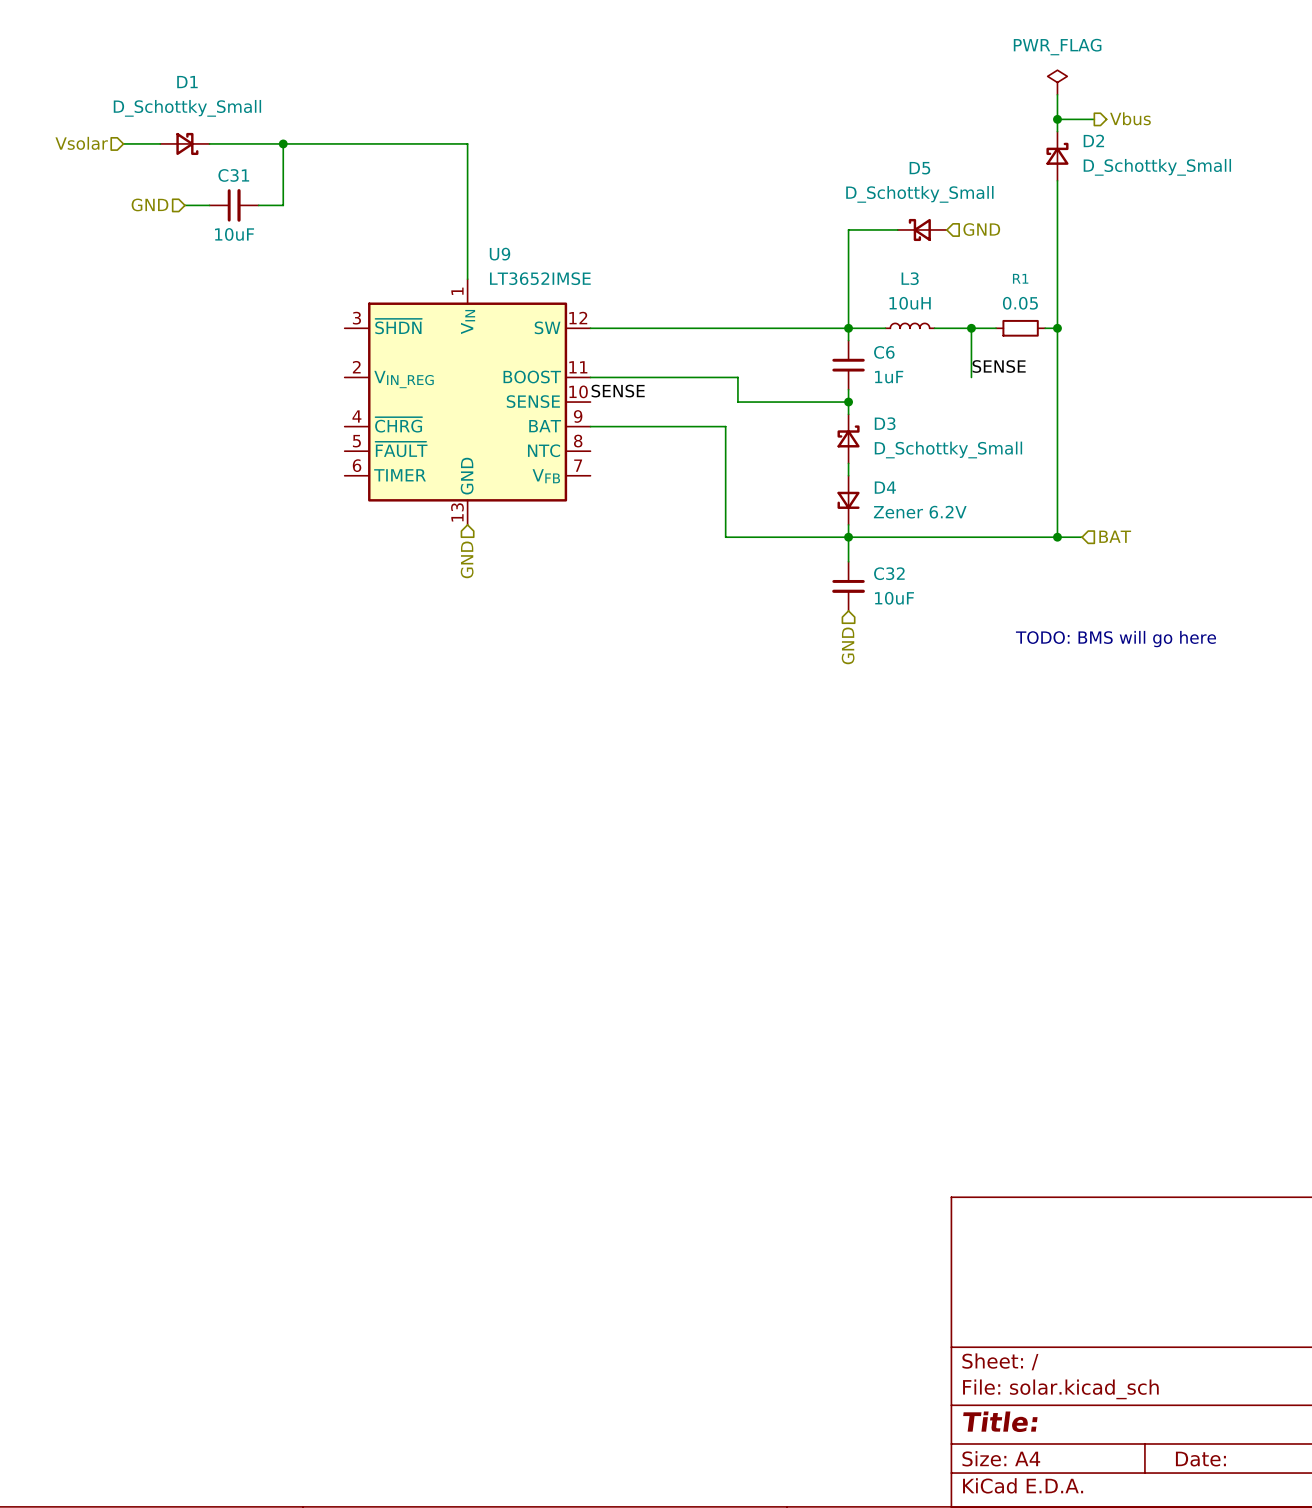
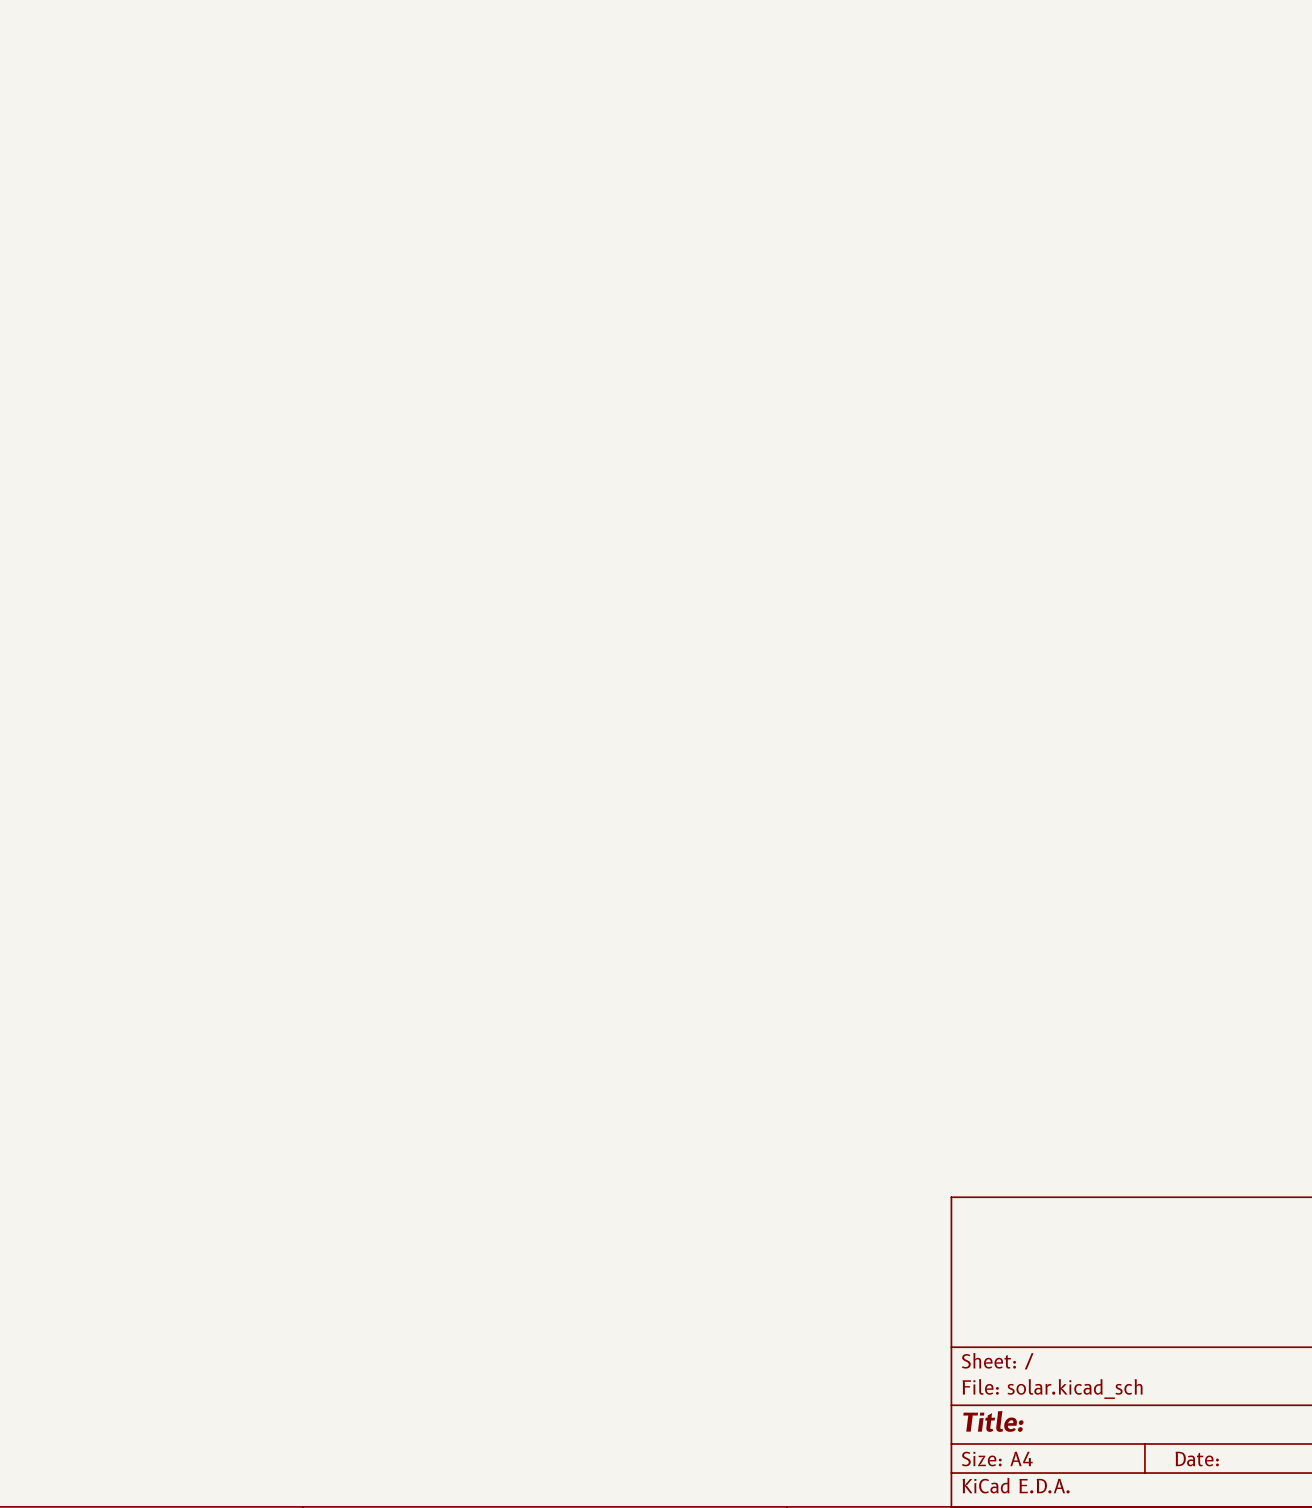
power symbol: PWR_FLAG (1057, 82) -> none
wire: (1057, 94) (1057, 131) -> none
hierarchical label: Vbus (1130, 118) -> none
wire: (1057, 119) (1094, 119) -> none
junction: (1057, 119) -> none
hierarchical label: Vsolar (81, 143) -> none
wire: (123, 143) (160, 143) -> none
D1: D_Schottky_Small (184, 143) -> none
wire: (209, 143) (467, 143) (467, 279) -> none
wire: (283, 143) (283, 205) (258, 205) -> none
junction: (283, 143) -> none
D2: D_Schottky_Small (1057, 156) -> none
wire: (1057, 180) (1057, 537) -> none
hierarchical label: GND (149, 204) -> none
wire: (184, 205) (209, 205) -> none
C31: 10uF (234, 205) -> none
wire: (897, 229) (848, 229) (848, 340) -> none
D5: D_Schottky_Small (922, 229) -> none
hierarchical label: GND (981, 229) -> none
L3: 10uH (910, 325) -> none
wire: (590, 328) (885, 328) -> none
junction: (848, 328) -> none
wire: (934, 328) (996, 328) -> none
wire: (971, 328) (971, 377) -> none
junction: (971, 328) -> none
R1: 0.05 (1020, 328) -> none
wire: (1045, 328) (1057, 328) -> none
junction: (1057, 328) -> none
C6: 1uF (848, 365) -> none
label: SENSE (999, 366) -> none
wire: (590, 377) (737, 377) (737, 402) (848, 402) -> none
wire: (848, 389) (848, 414) -> none
label: SENSE (618, 391) -> none
U9: LT3652IMSE (467, 402) -> none
junction: (848, 402) -> none
wire: (590, 426) (725, 426) (725, 537) (1082, 537) -> none
D3: D_Schottky_Small (848, 438) -> none
wire: (848, 463) (848, 475) -> none
D4: Zener 6.2V (848, 500) -> none
wire: (848, 524) (848, 561) -> none
hierarchical label: BAT (1115, 536) -> none
junction: (848, 537) -> none
junction: (1057, 537) -> none
hierarchical label: GND (467, 559) -> none
C32: 10uF (848, 586) -> none
text: TODO: BMS will go here (1115, 639) -> none
hierarchical label: GND (848, 645) -> none

